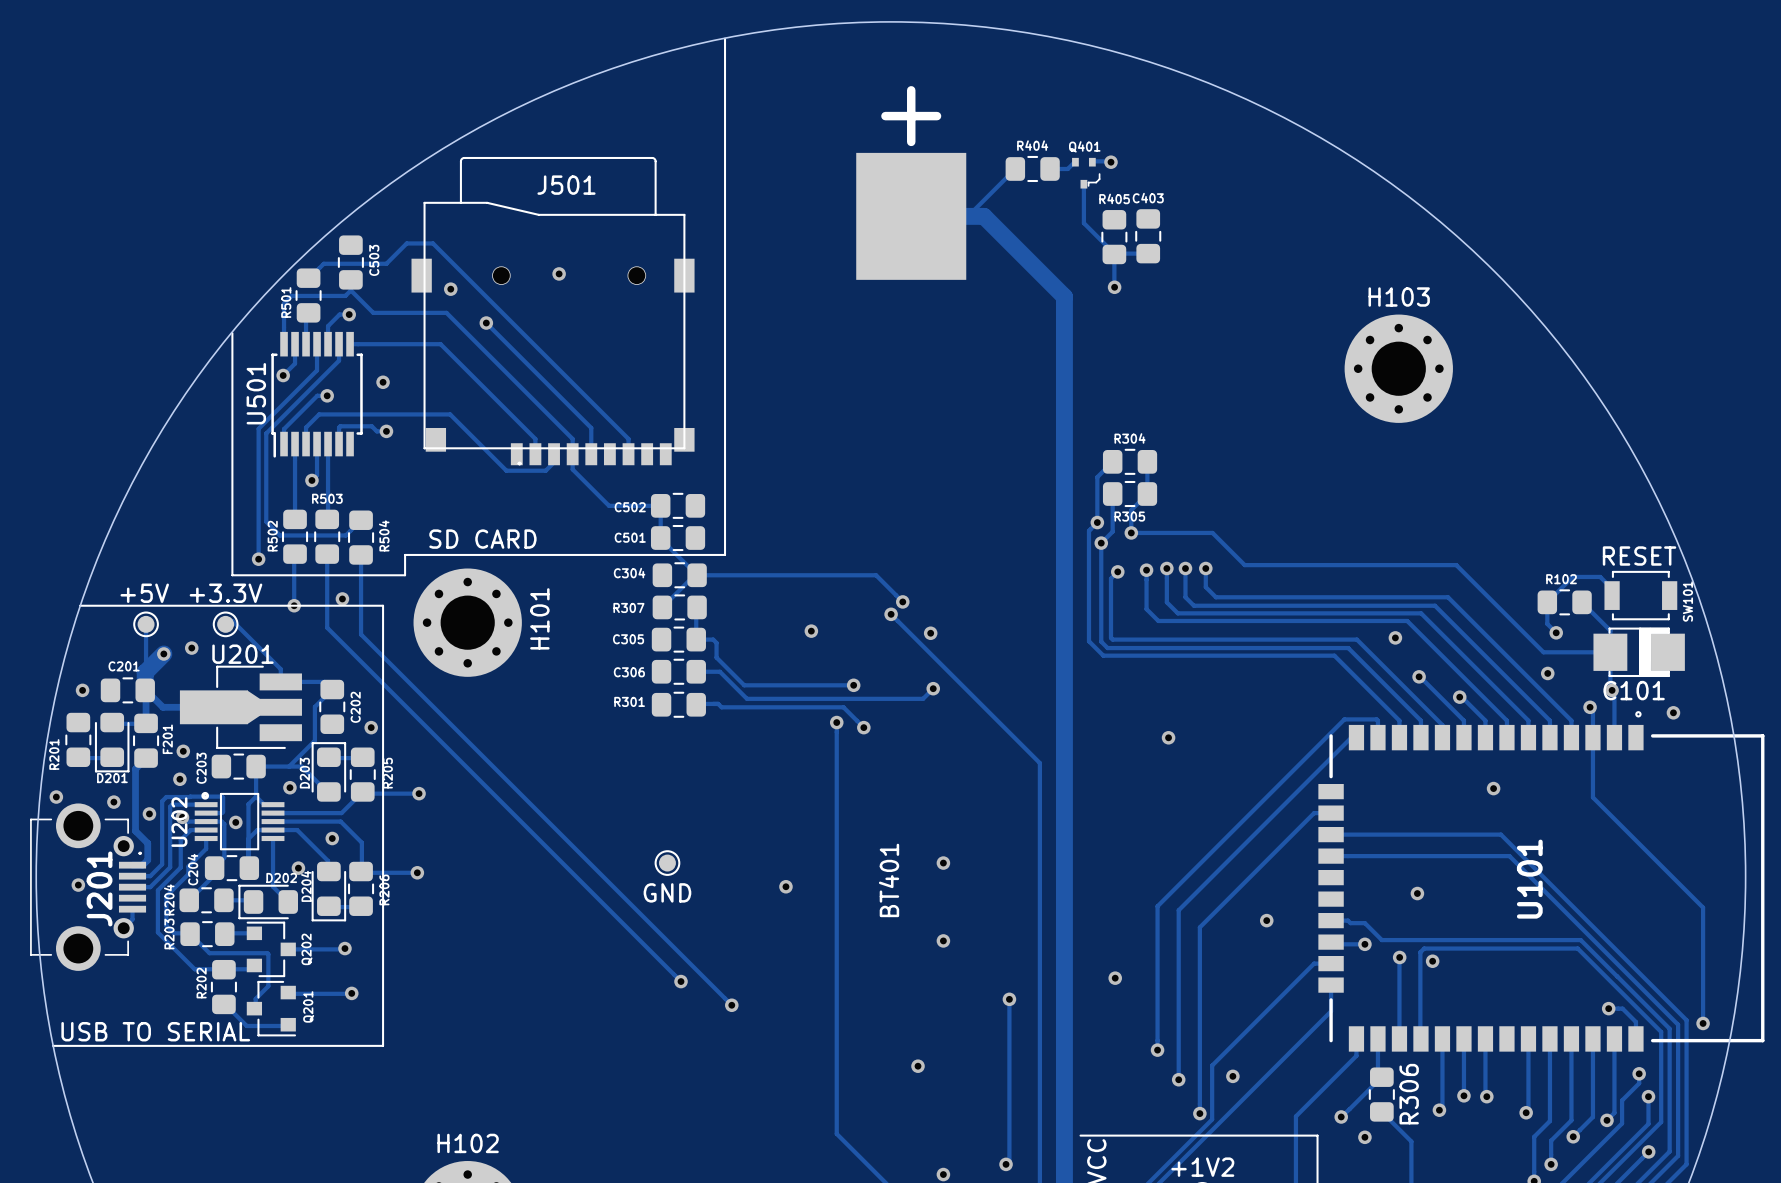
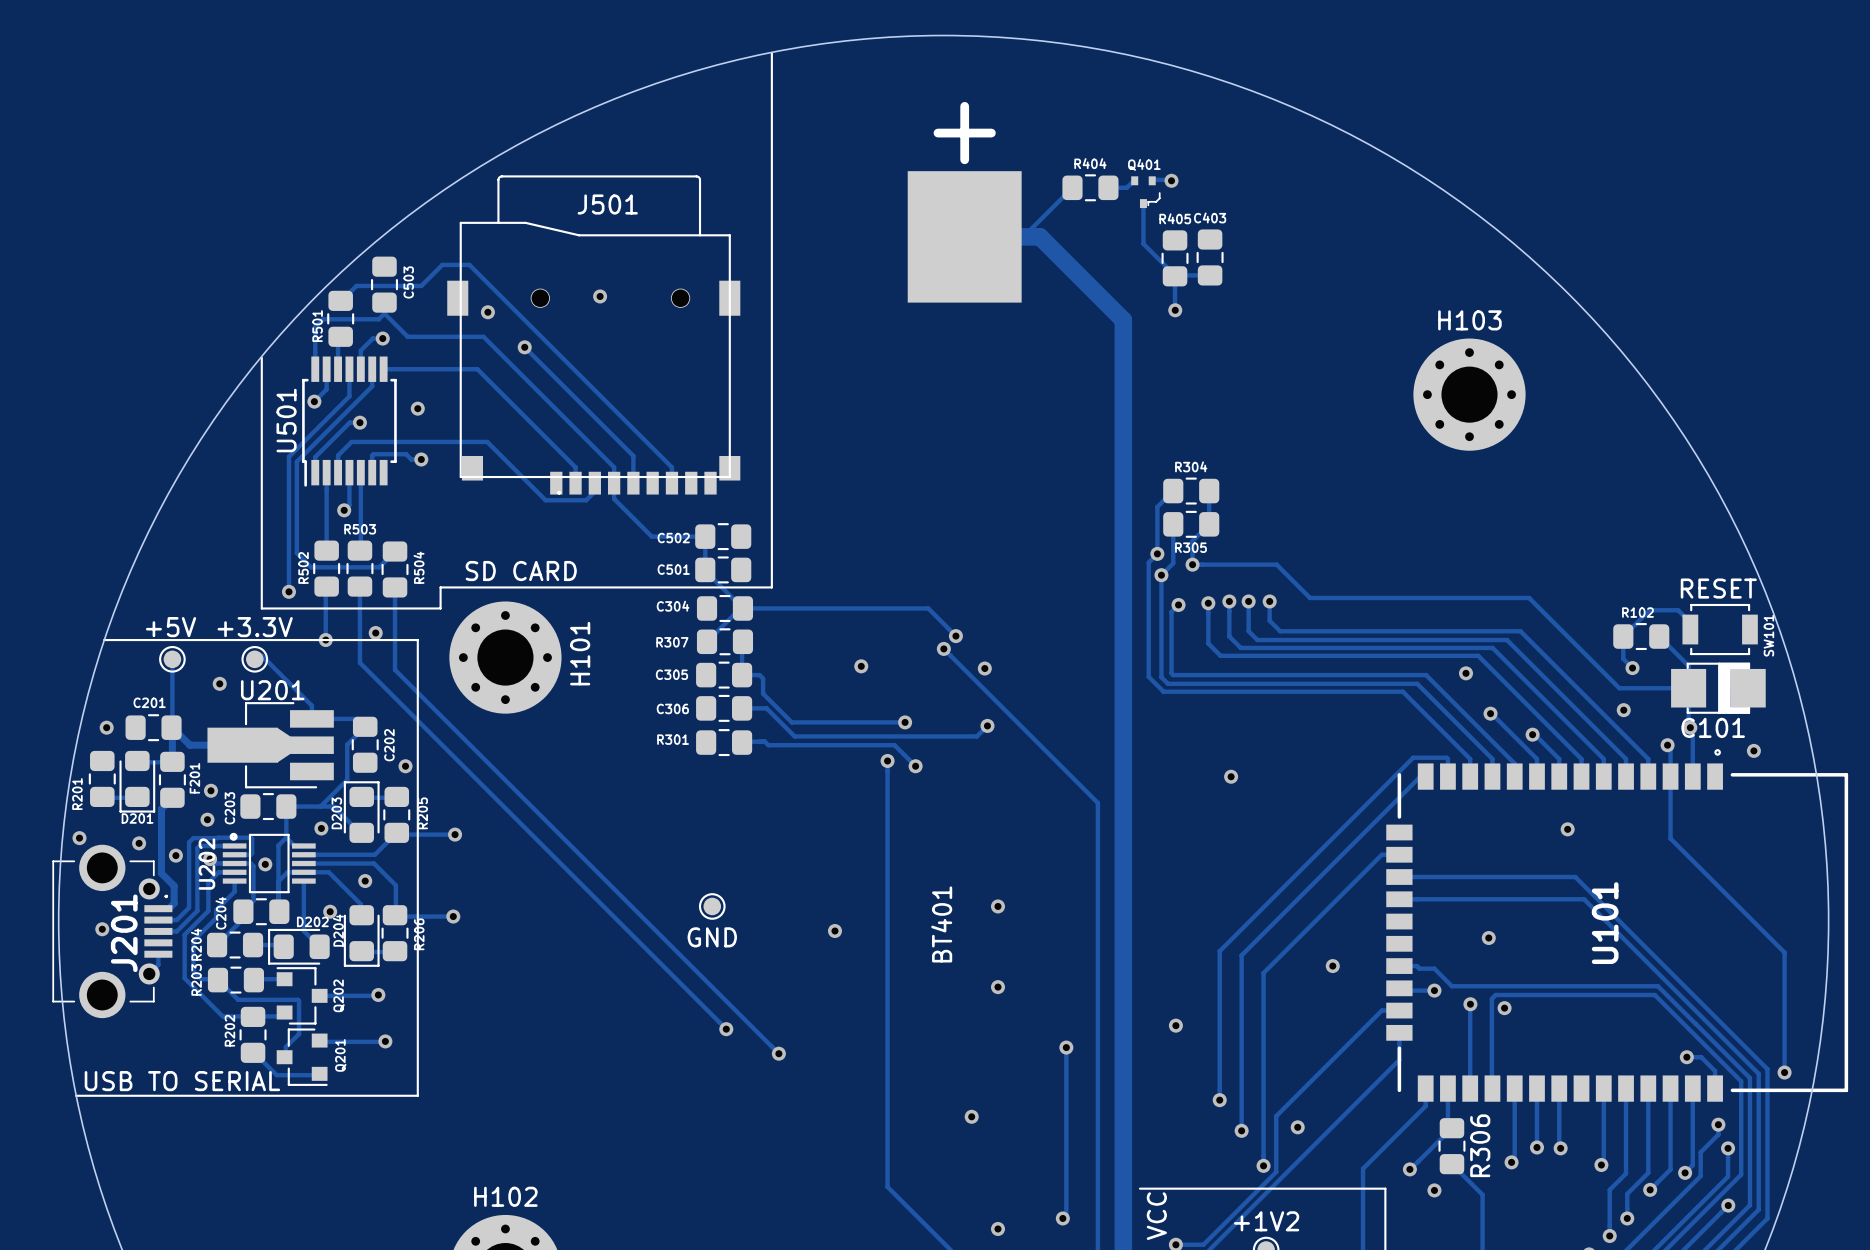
track: (163, 653) (145, 672) (145, 690) -> none
via: (163, 653) -> none

